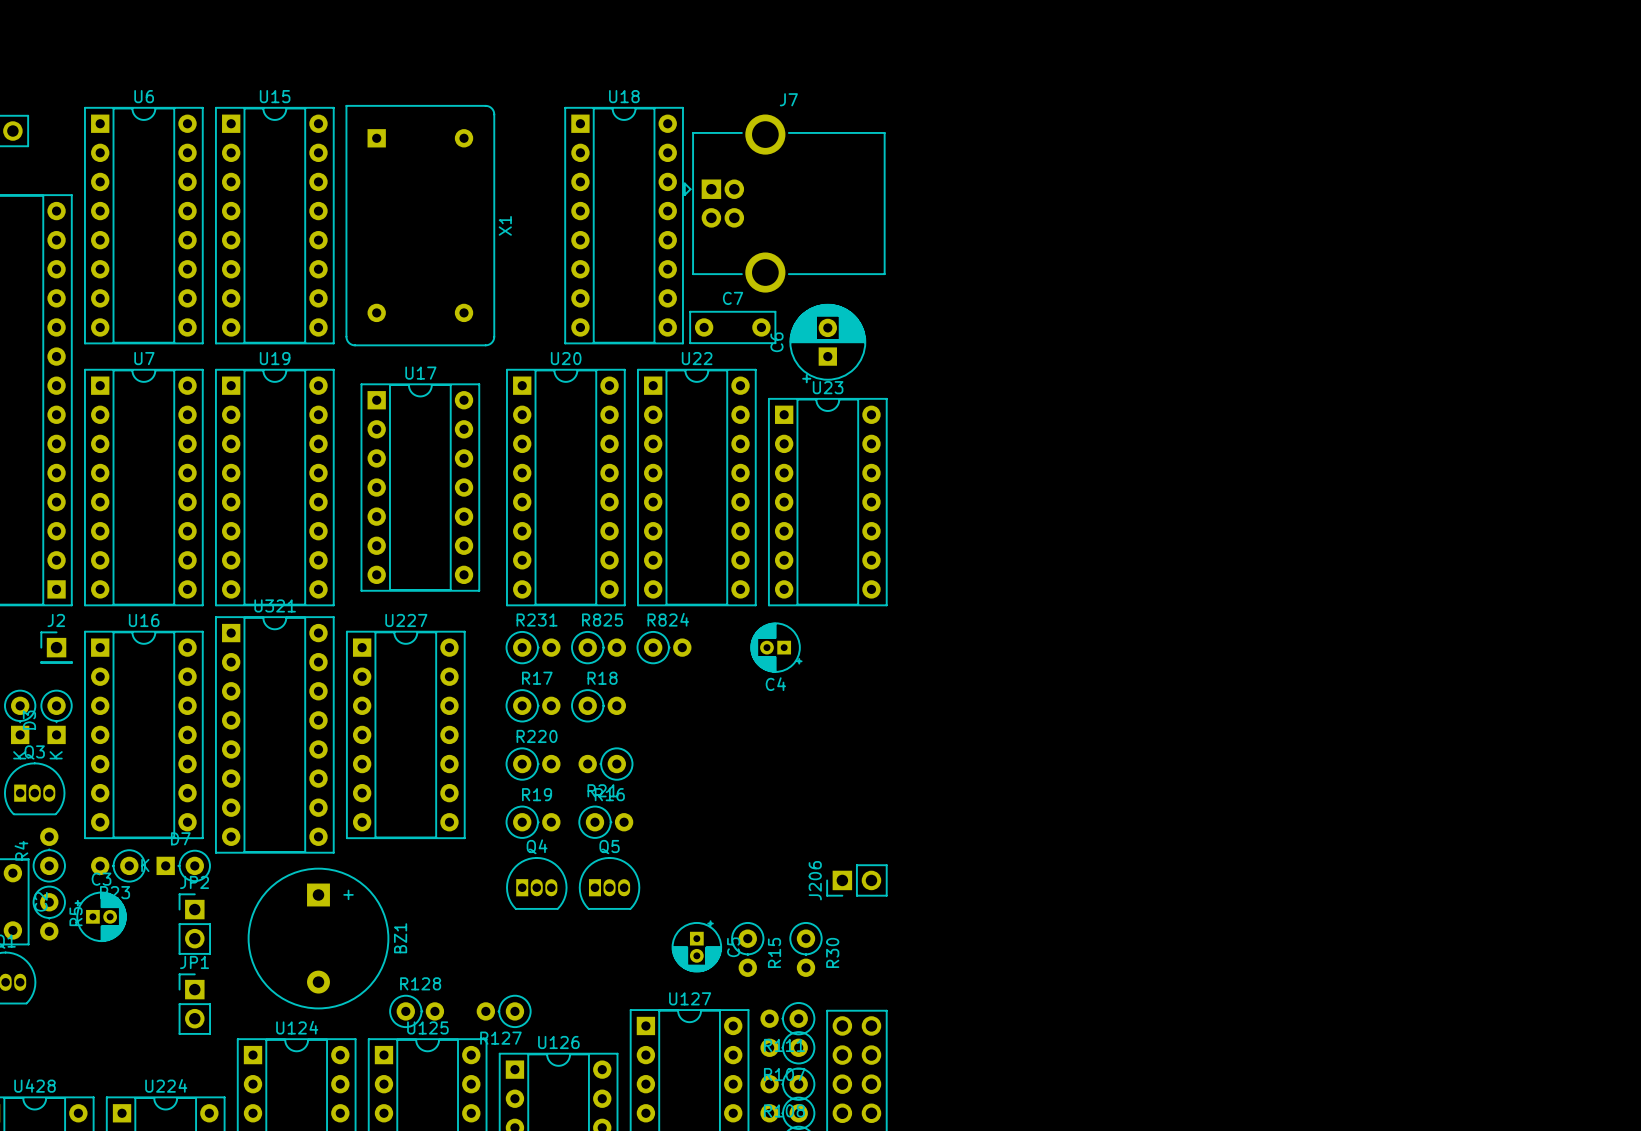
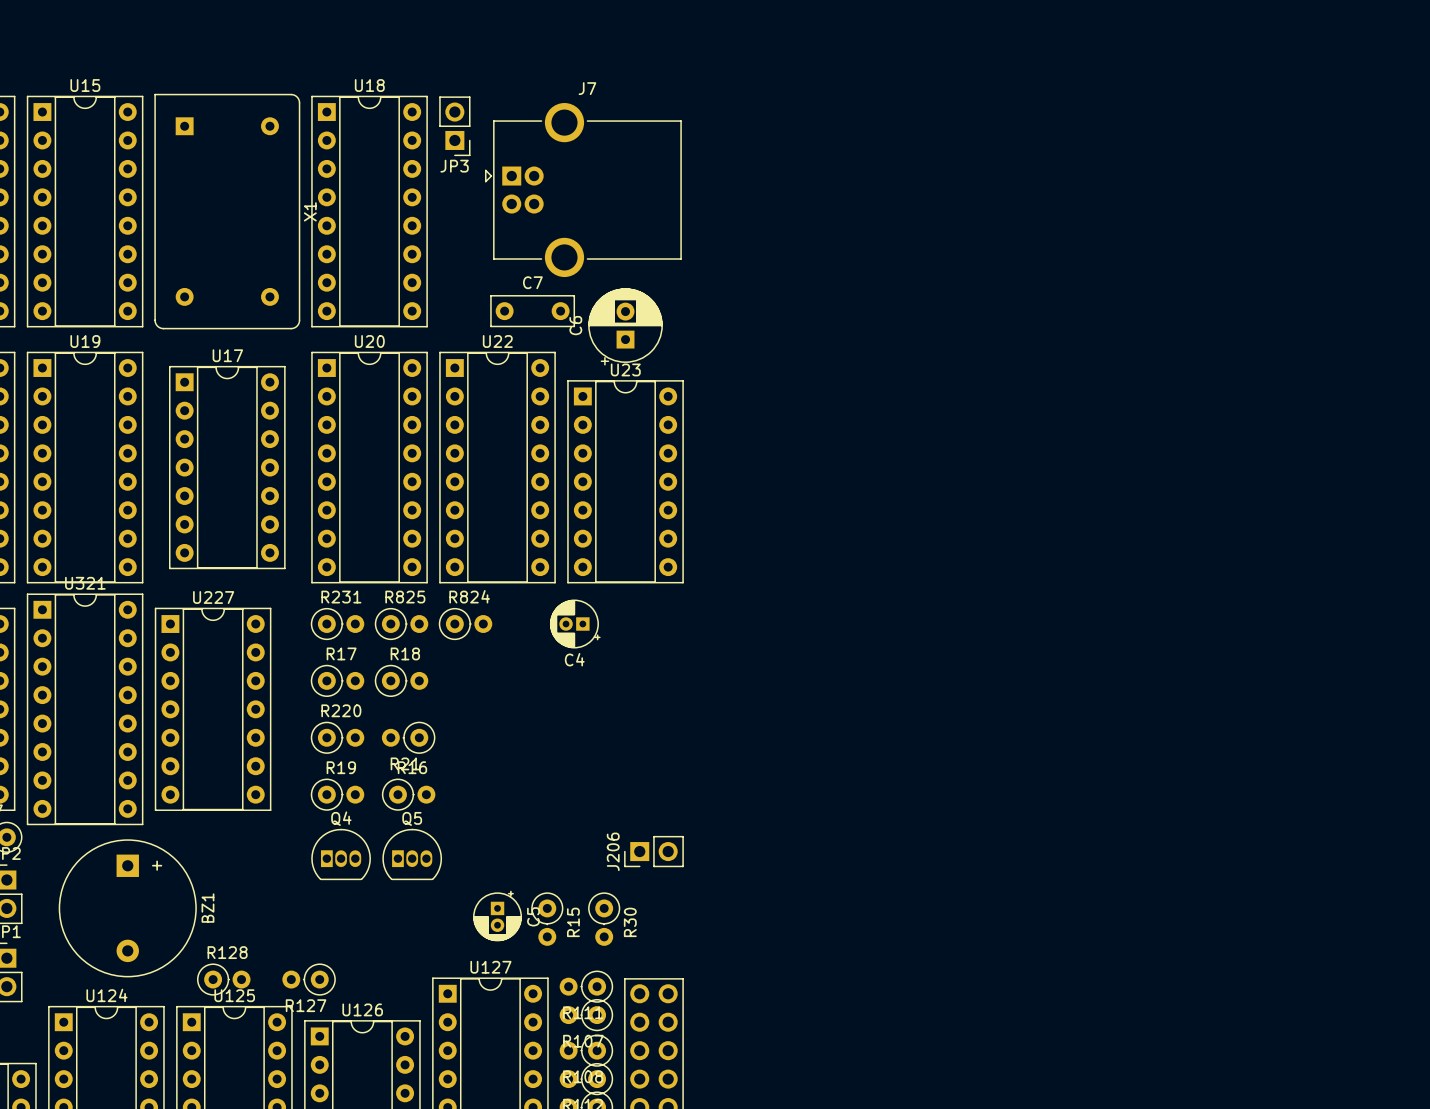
JP3: none -> (454, 126)
U18 position: (624, 225) -> (369, 211)

